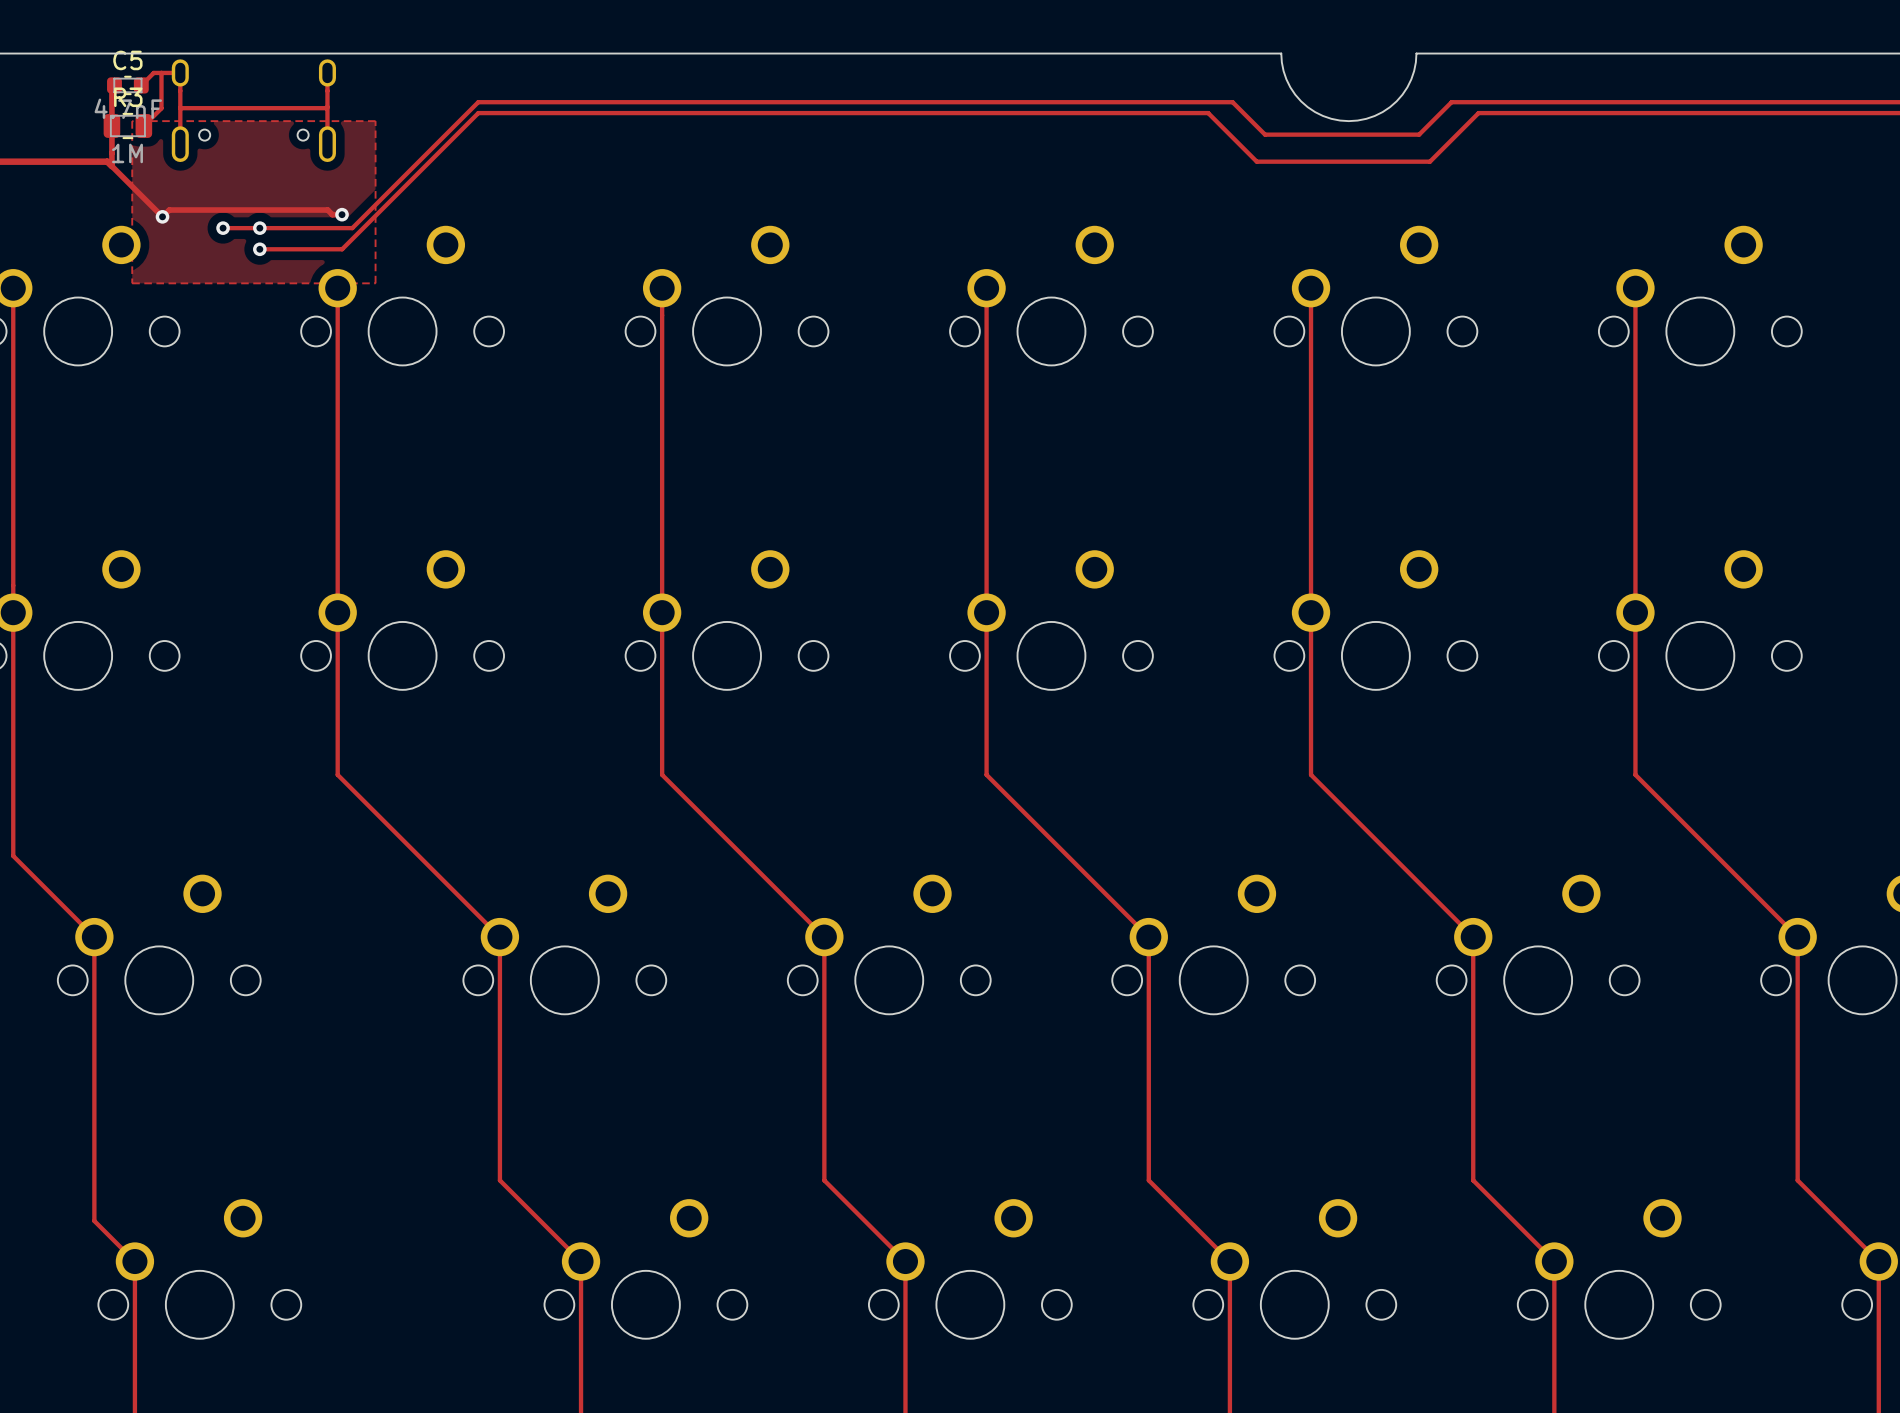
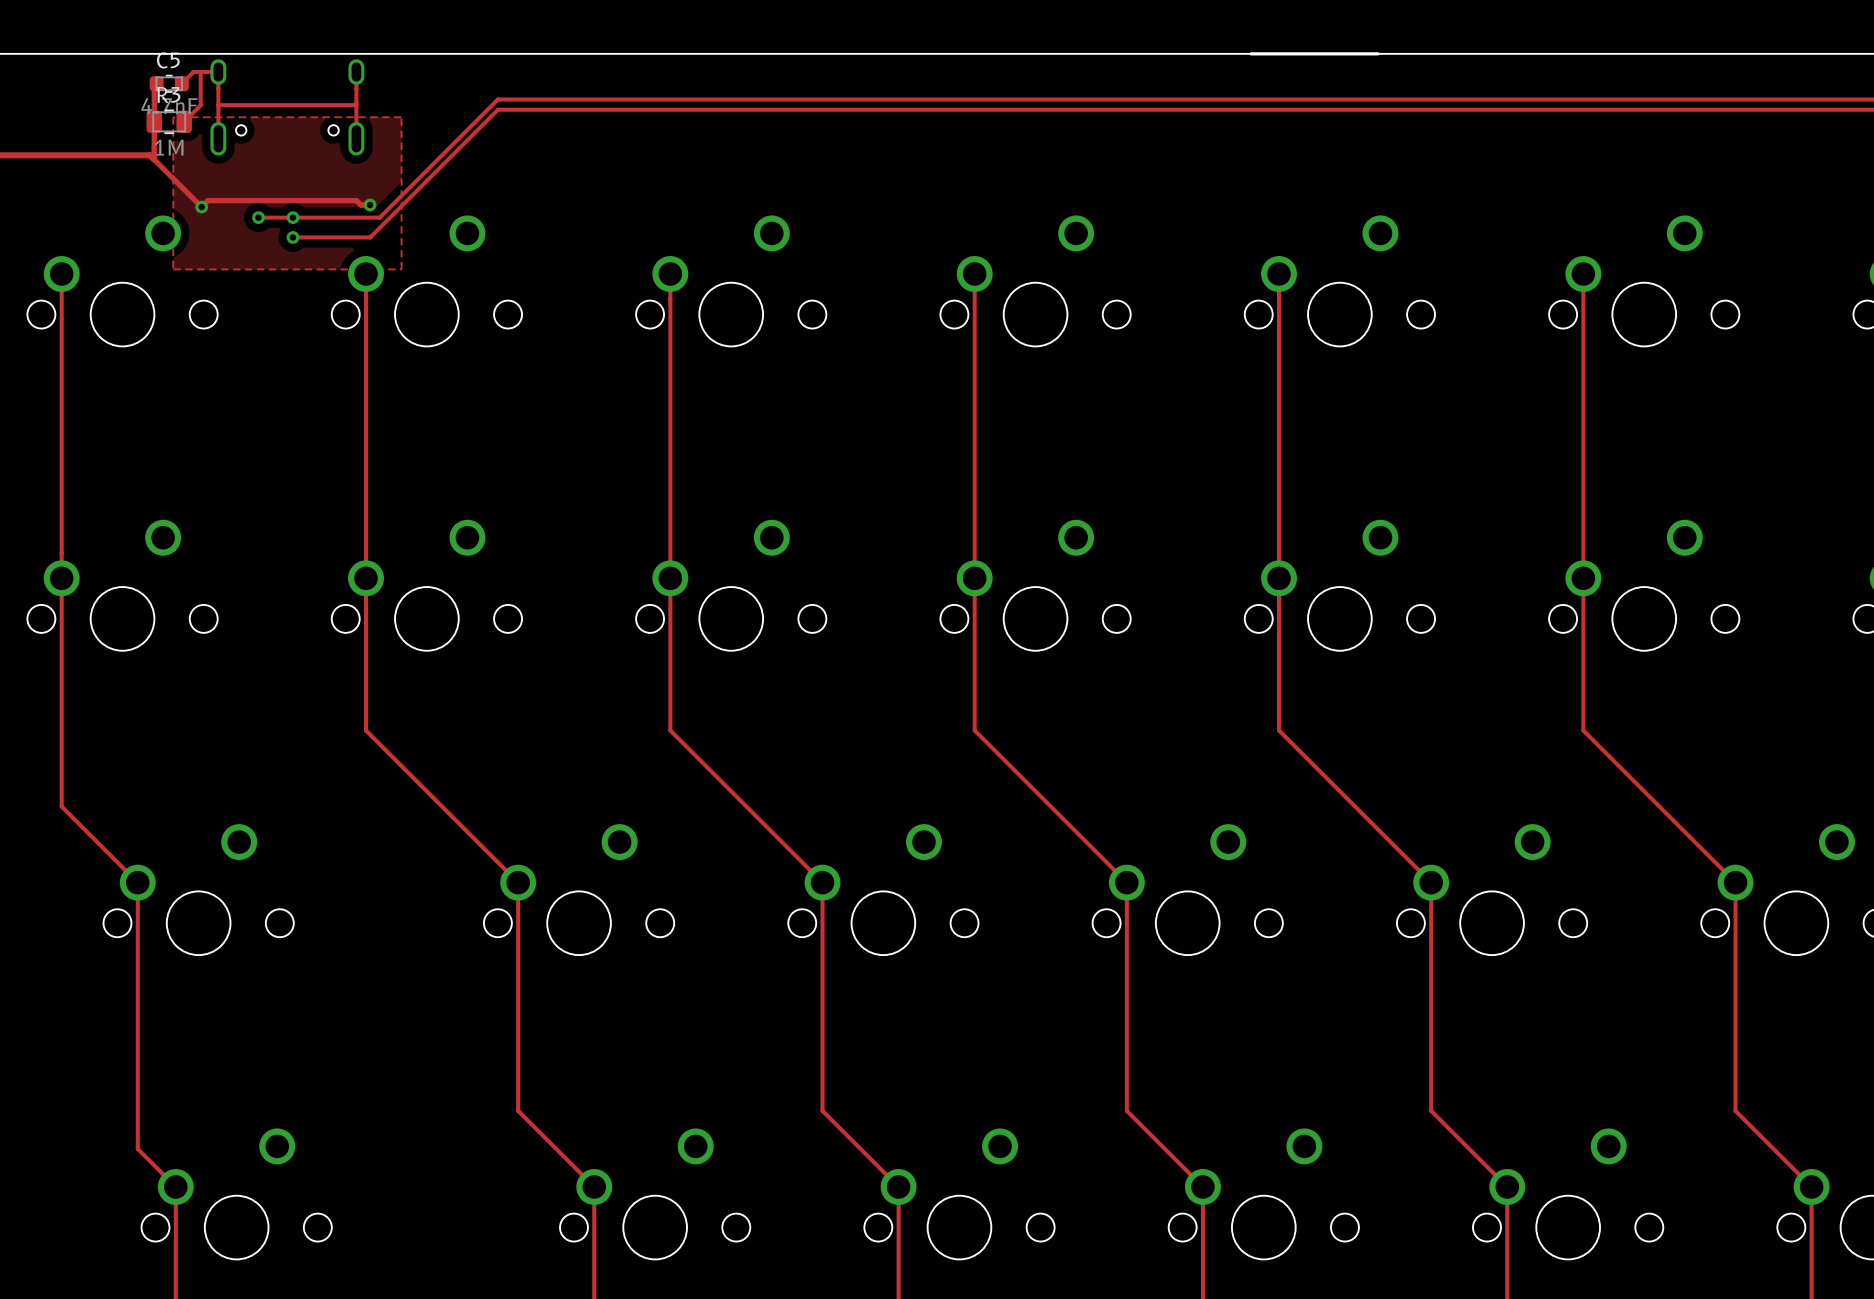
board edge: (1281, 53) (1286, 79) (1301, 101) (1323, 115) (1348, 121) (1374, 115) (1396, 101) (1411, 79) (1416, 53) -> (1251, 53) (1377, 53)
track: (1232, 102) (1265, 134) (1419, 134) (1451, 102) -> (1205, 99) (1410, 99)
track: (1208, 113) (1256, 161) (1429, 161) (1478, 113) -> (1182, 109) (1436, 109)

